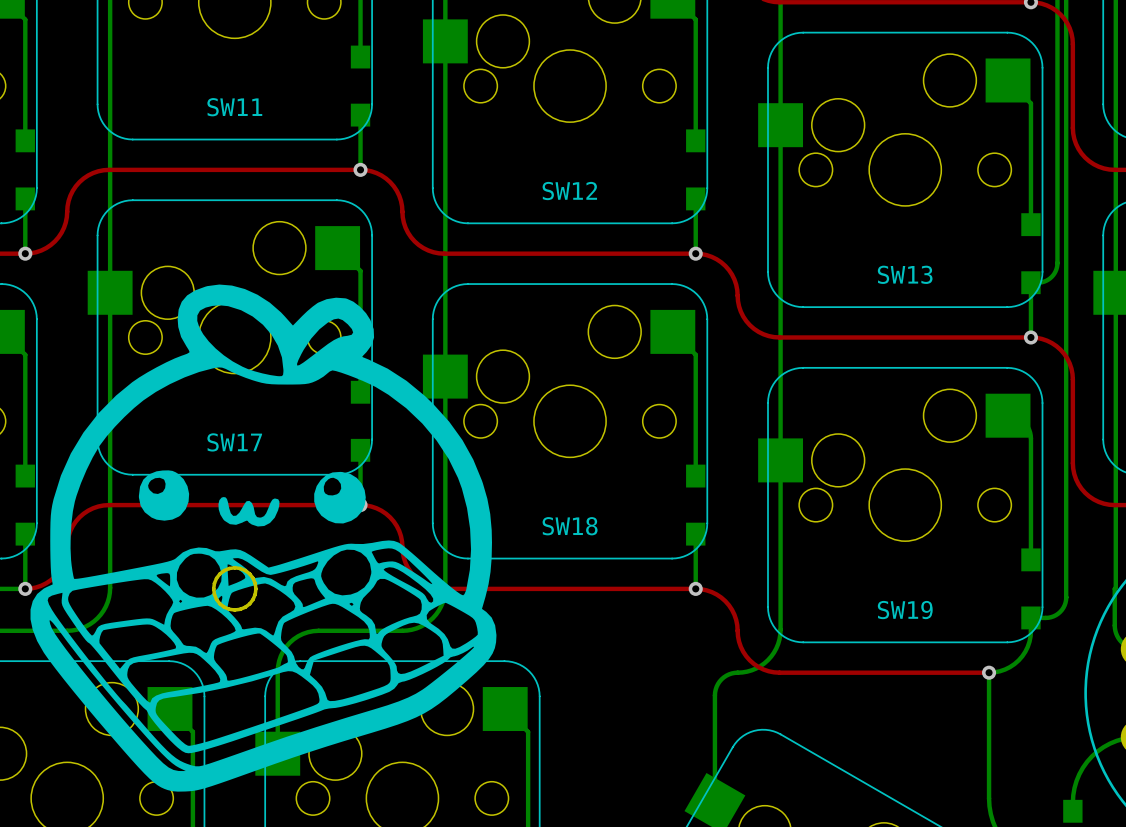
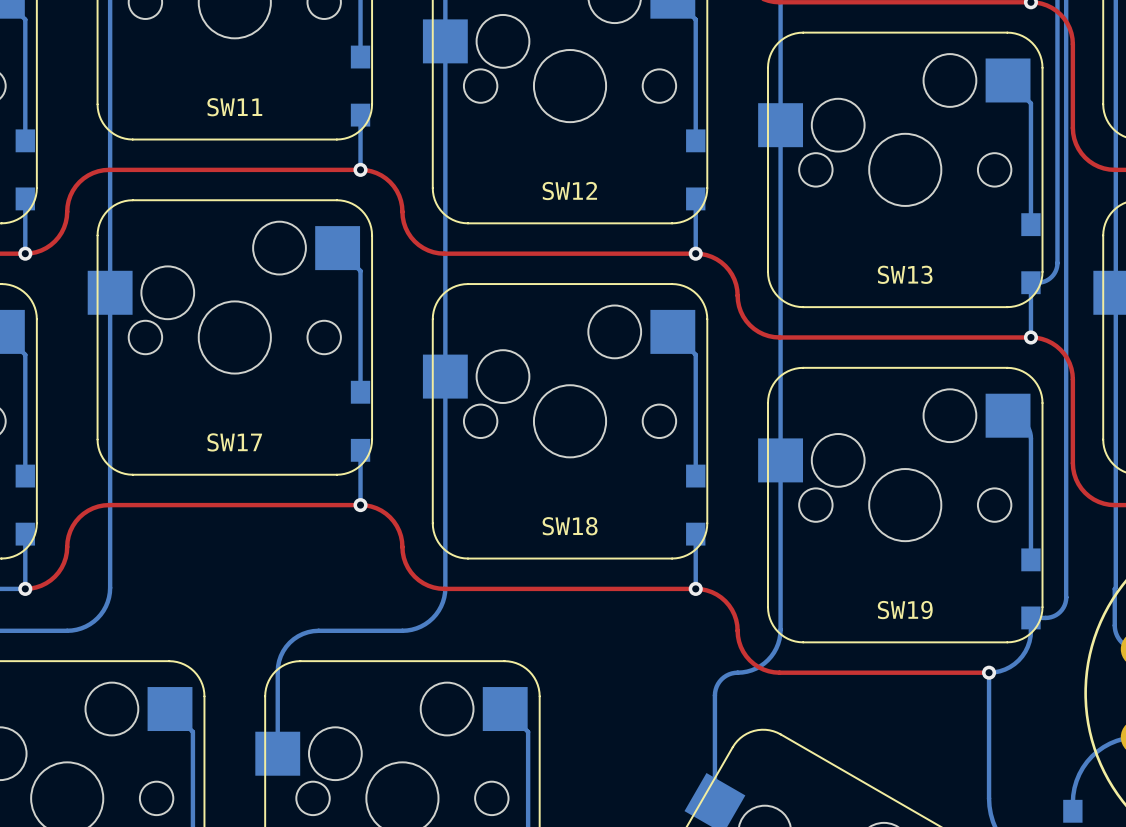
drawing: [30, 284, 497, 792] -> none
board edge: (234, 567) (249, 573) (255, 588) (249, 603) (234, 610) (219, 603) (213, 588) (219, 573) (234, 567) -> none

